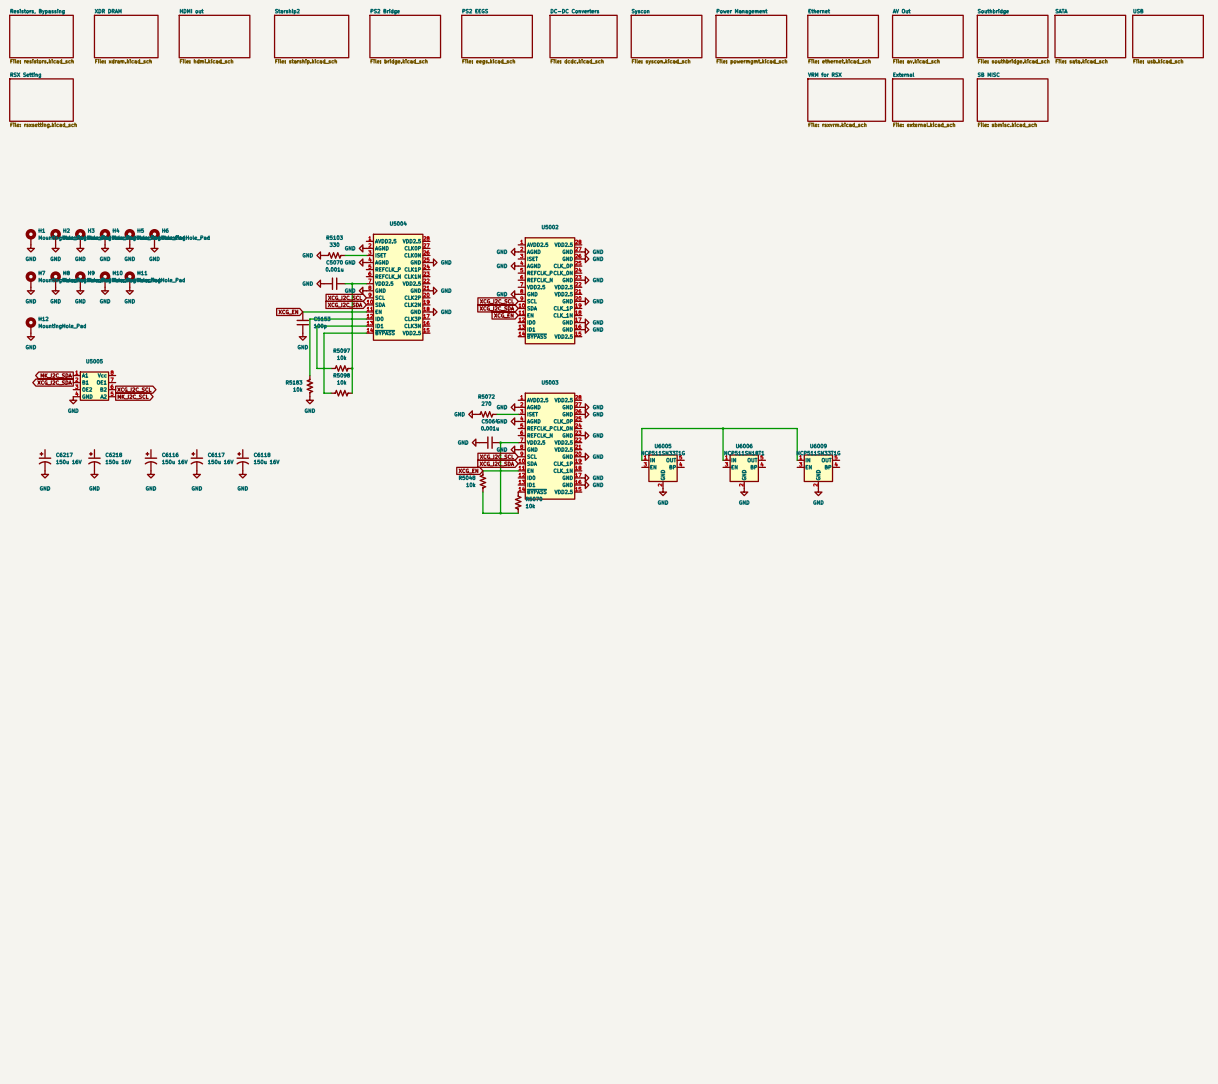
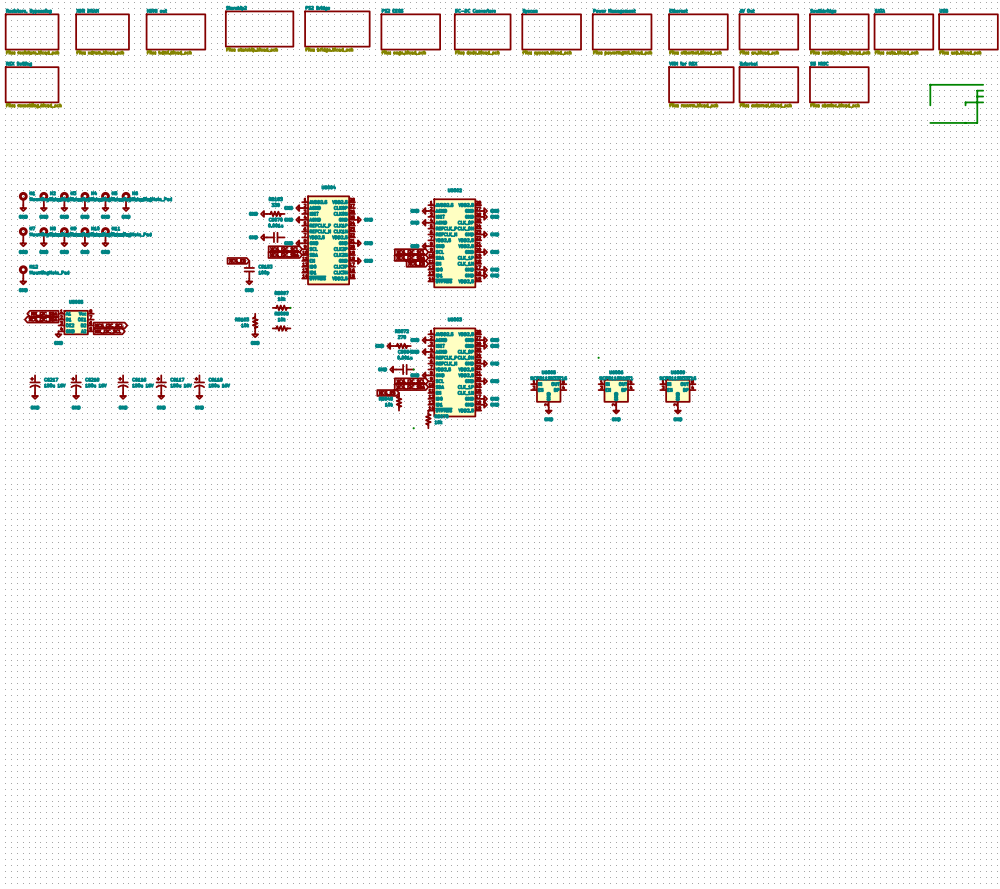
sheet shape: [274, 15, 349, 58] -> [225, 11, 294, 47]
sheet shape: [369, 15, 441, 58] -> [304, 11, 370, 47]
wire: none -> (983, 84) (930, 84) (930, 105)
wire: none -> (983, 90) (977, 90) (977, 122) (930, 122)
wire: none -> (977, 96) (983, 96)
wire: none -> (983, 102) (965, 102) (965, 105)
wire: (345, 255) (366, 255) -> none
wire: (345, 283) (366, 283) -> none
wire: (352, 283) (352, 393) -> none
wire: (302, 311) (366, 311) -> none
wire: (366, 319) (309, 319) (309, 375) -> none
wire: (366, 326) (316, 326) (316, 368) (331, 368) -> none
wire: (366, 333) (324, 333) (324, 393) (331, 393) -> none
wire: (497, 414) (518, 414) -> none
wire: (723, 428) (723, 460) -> none
wire: (518, 442) (500, 442) (500, 513) -> none
wire: (641, 460) (641, 428) (797, 428) (797, 460) -> none
wire: (482, 470) (518, 470) -> none
wire: (482, 492) (482, 513) (518, 513) -> none

